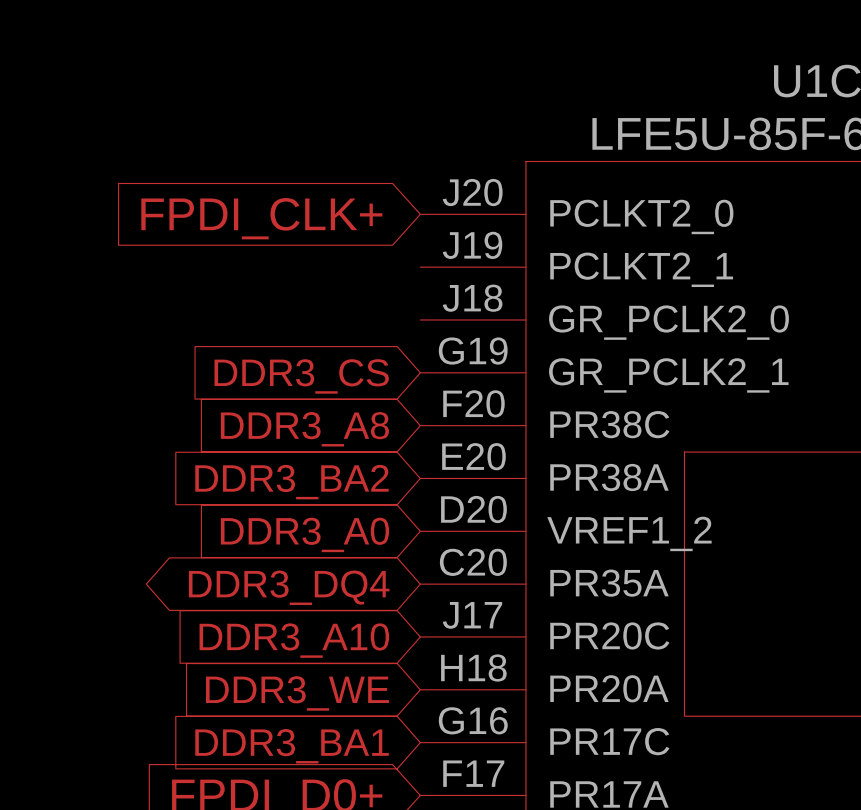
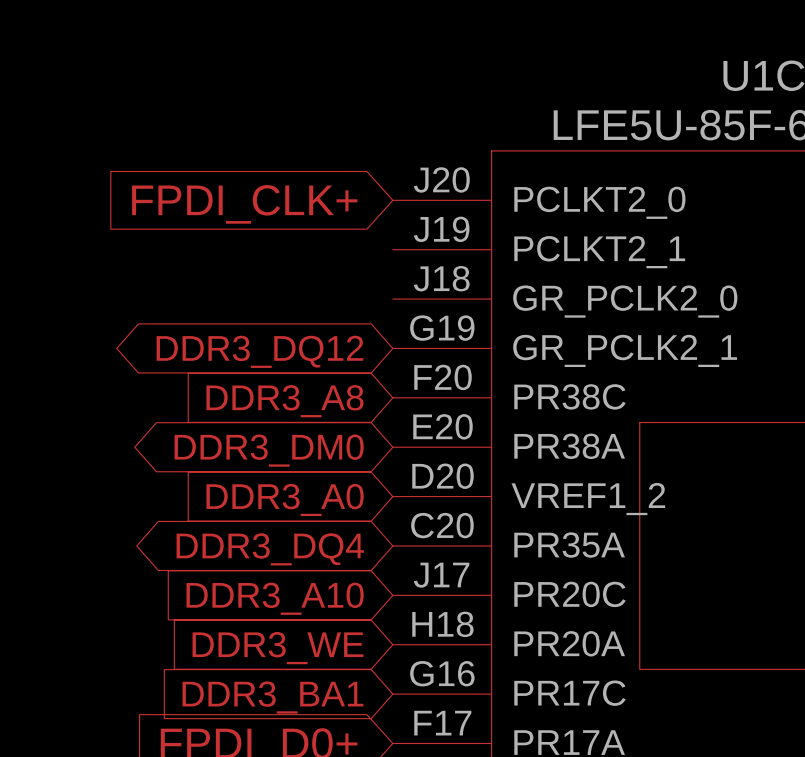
global label shape: input (301, 376) -> bidirectional (259, 351)
global label: DDR3_CS (301, 376) -> DDR3_DQ12 (259, 351)
global label shape: input (291, 482) -> bidirectional (269, 450)
global label: DDR3_BA2 (291, 482) -> DDR3_DM0 (269, 450)

